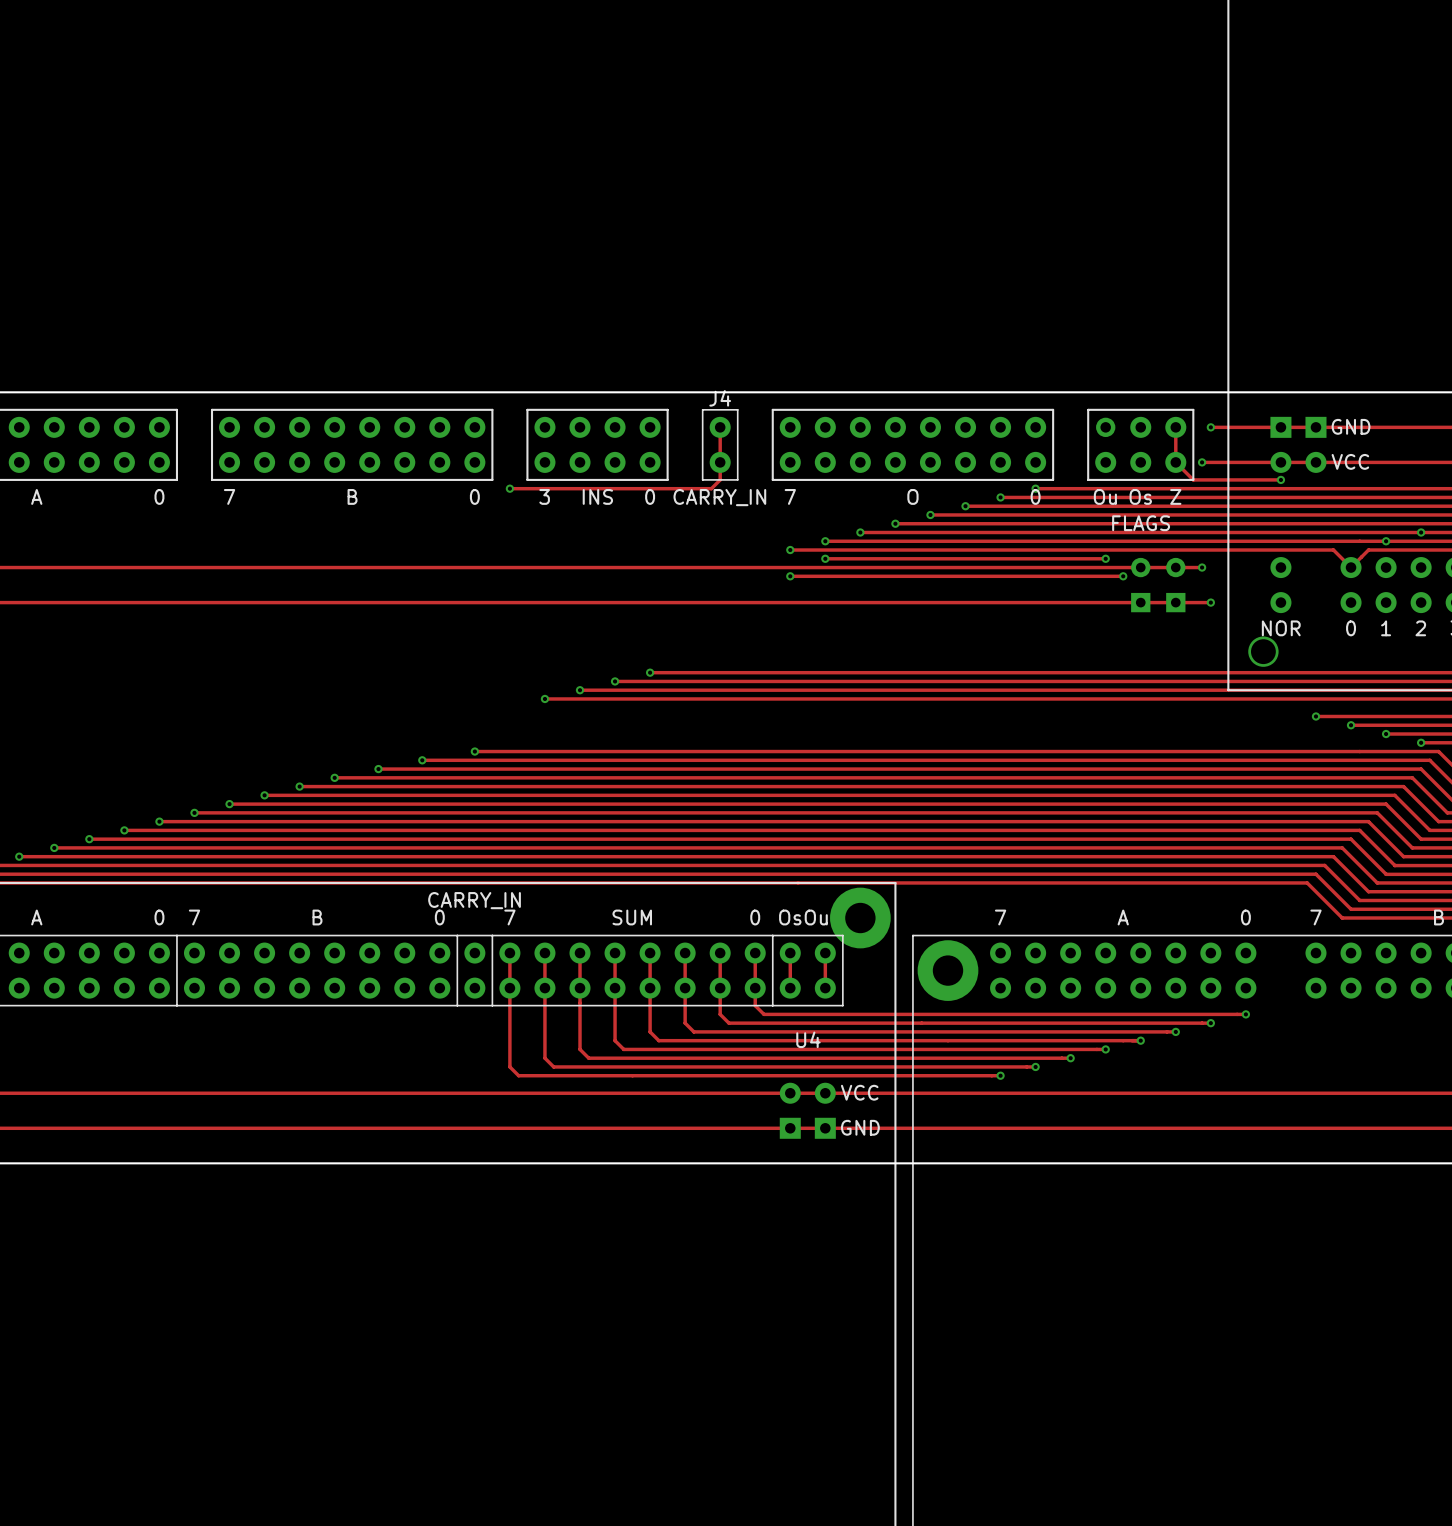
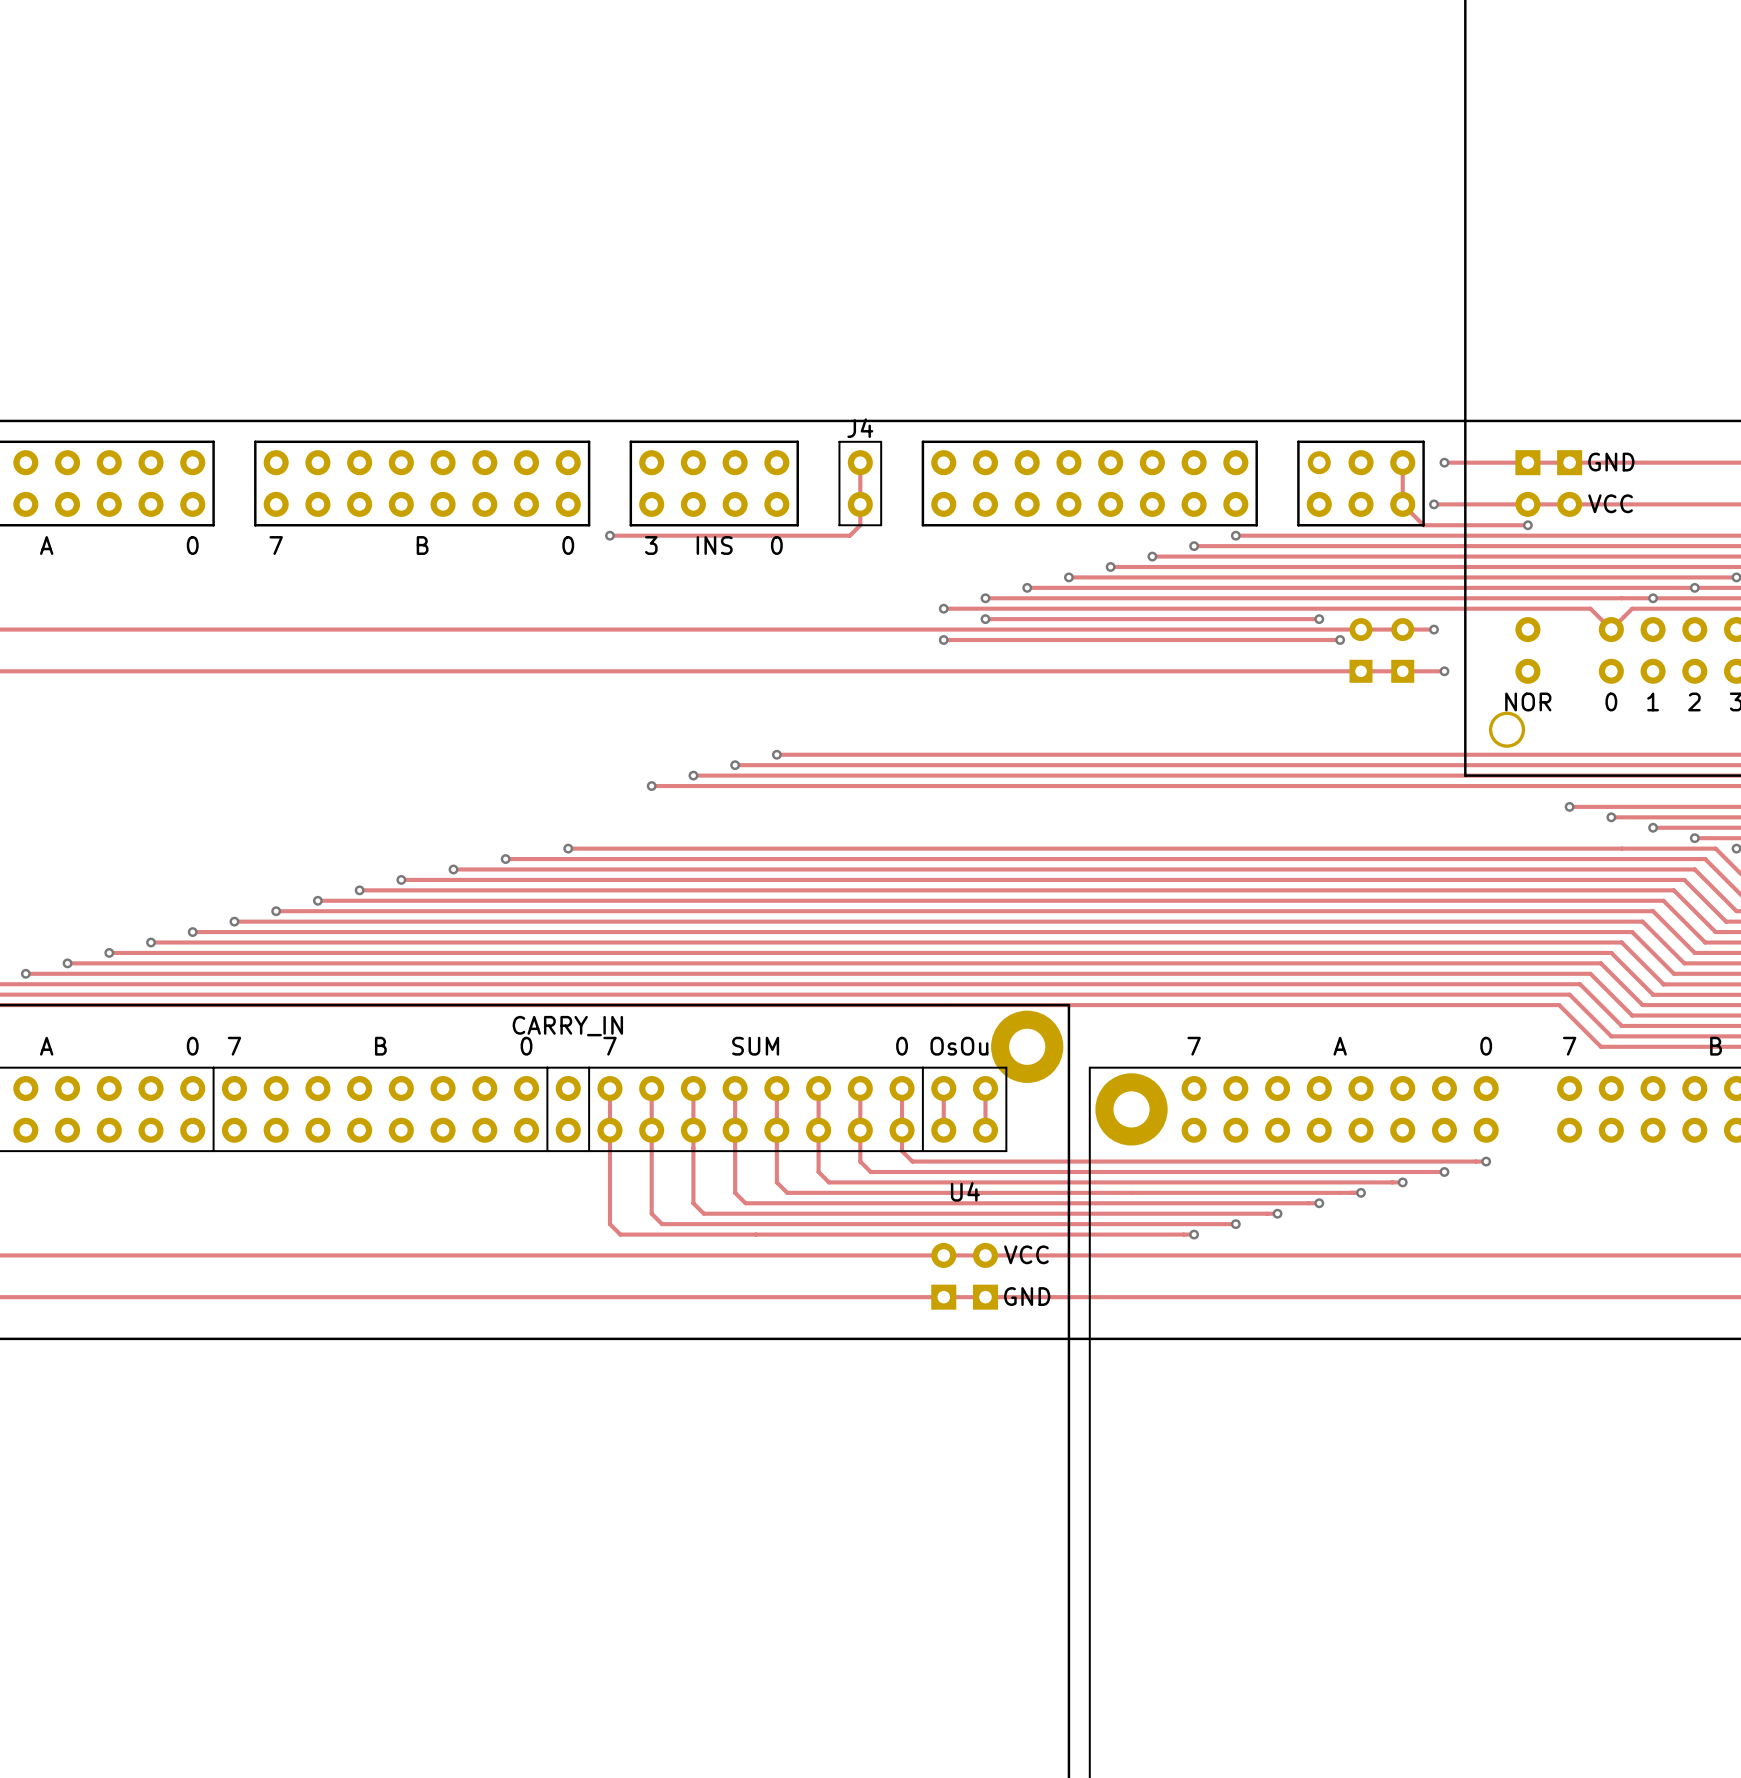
text: 7 (790, 496) -> none
text: O (912, 496) -> none
text: 0 (1035, 496) -> none
text: Ou (1105, 496) -> none
text: Os (1140, 496) -> none
text: Z (1175, 496) -> none
text: CARRY_IN (719, 497) -> none
text: FLAGS (1141, 523) -> none

